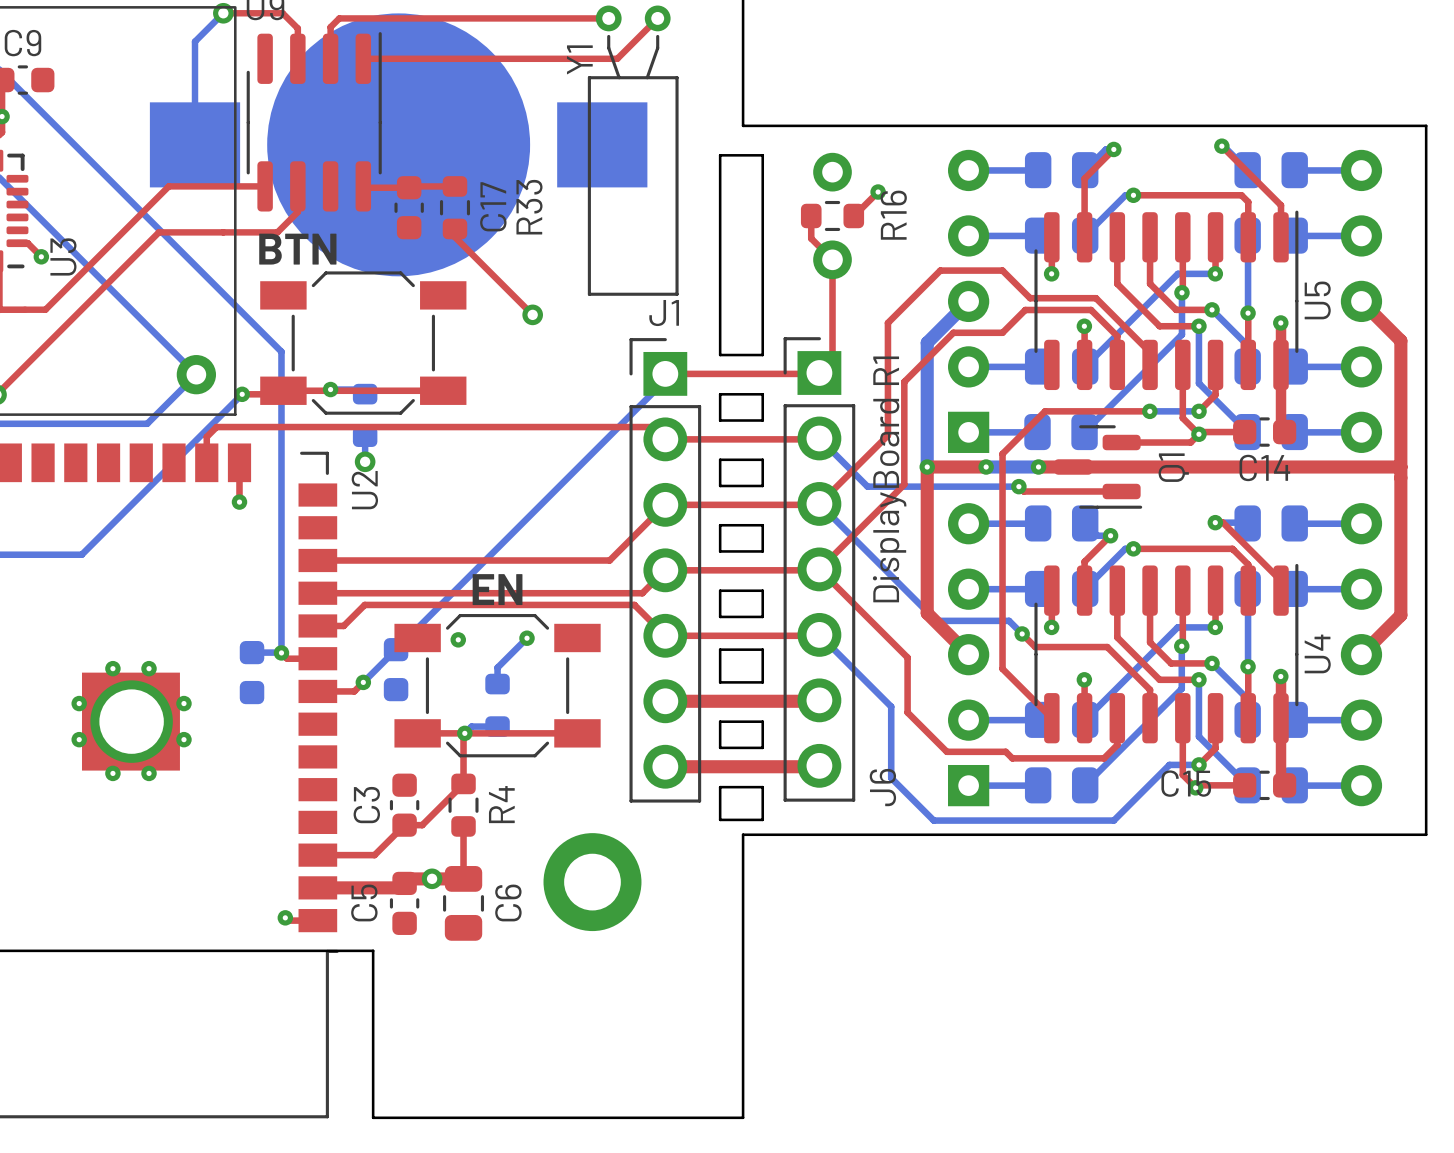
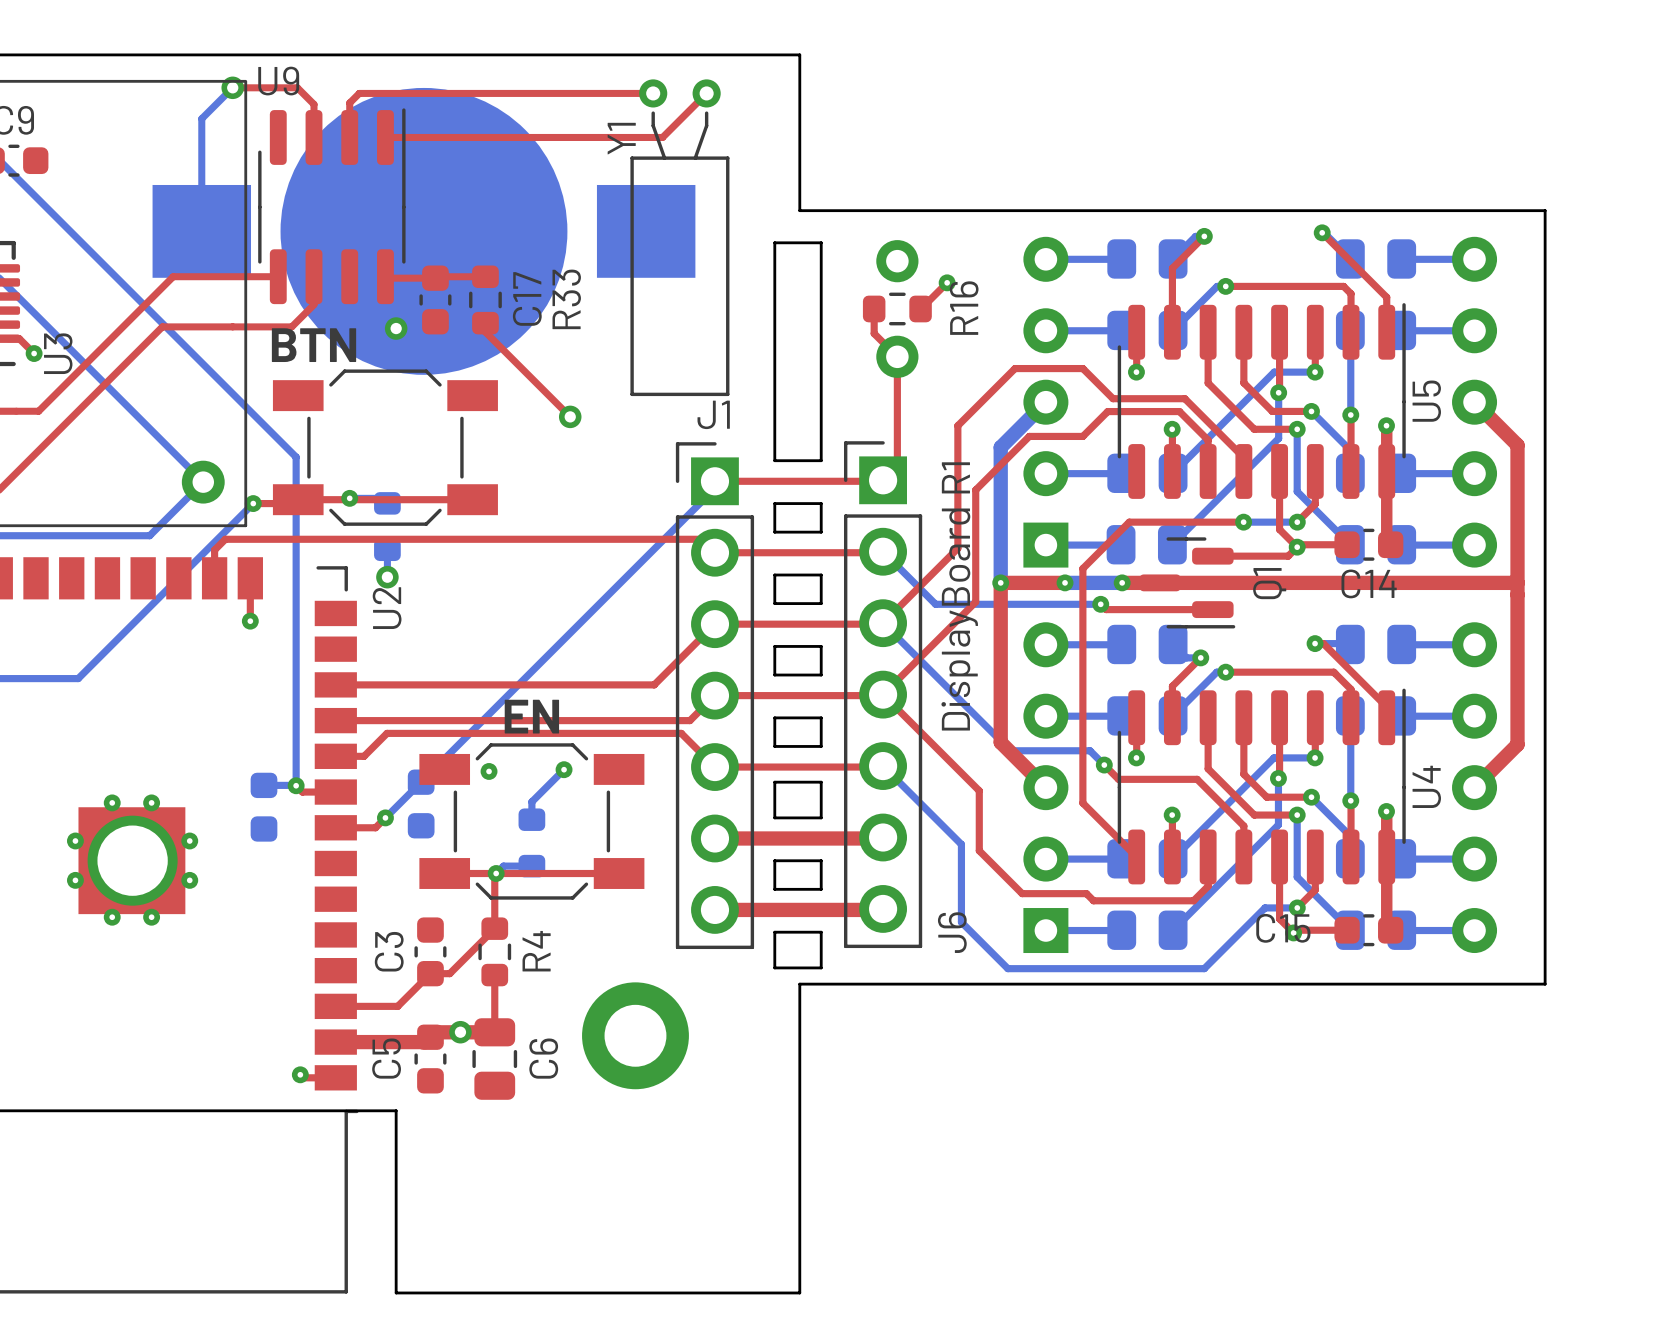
via: none -> (396, 328)

